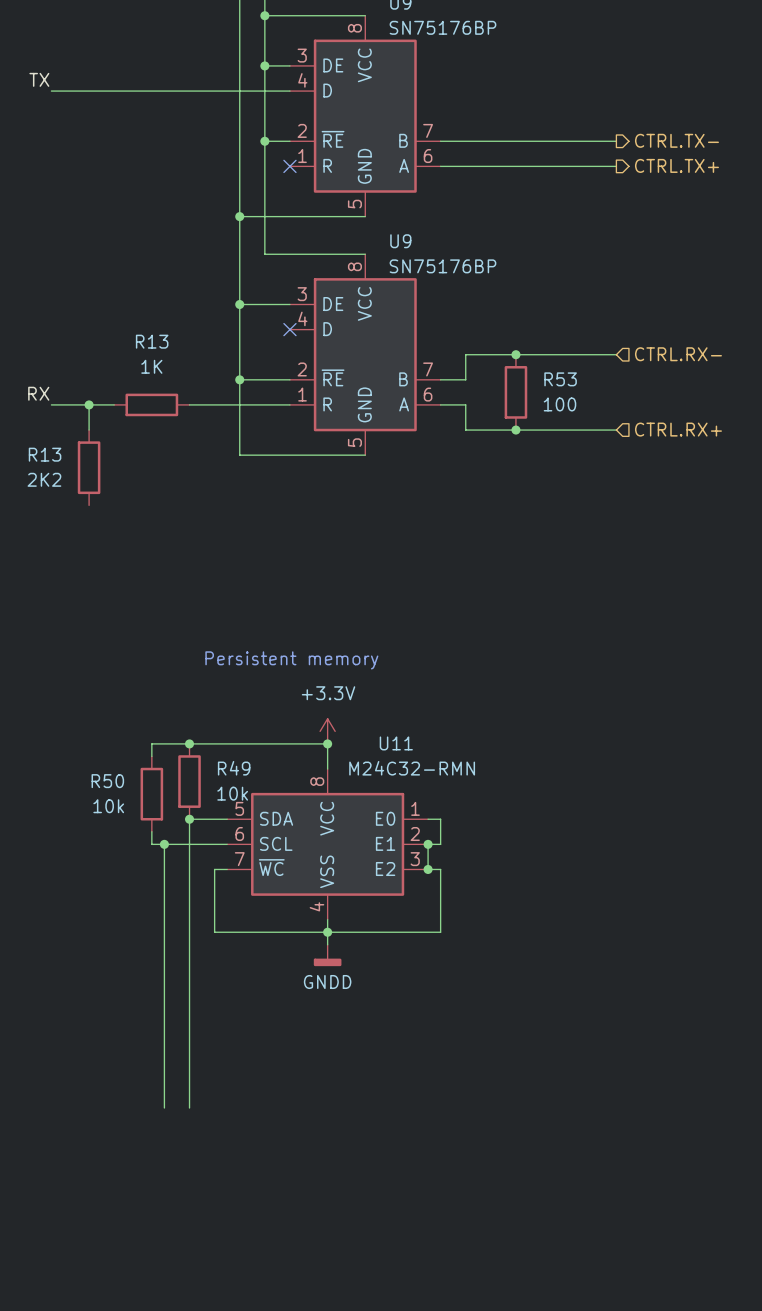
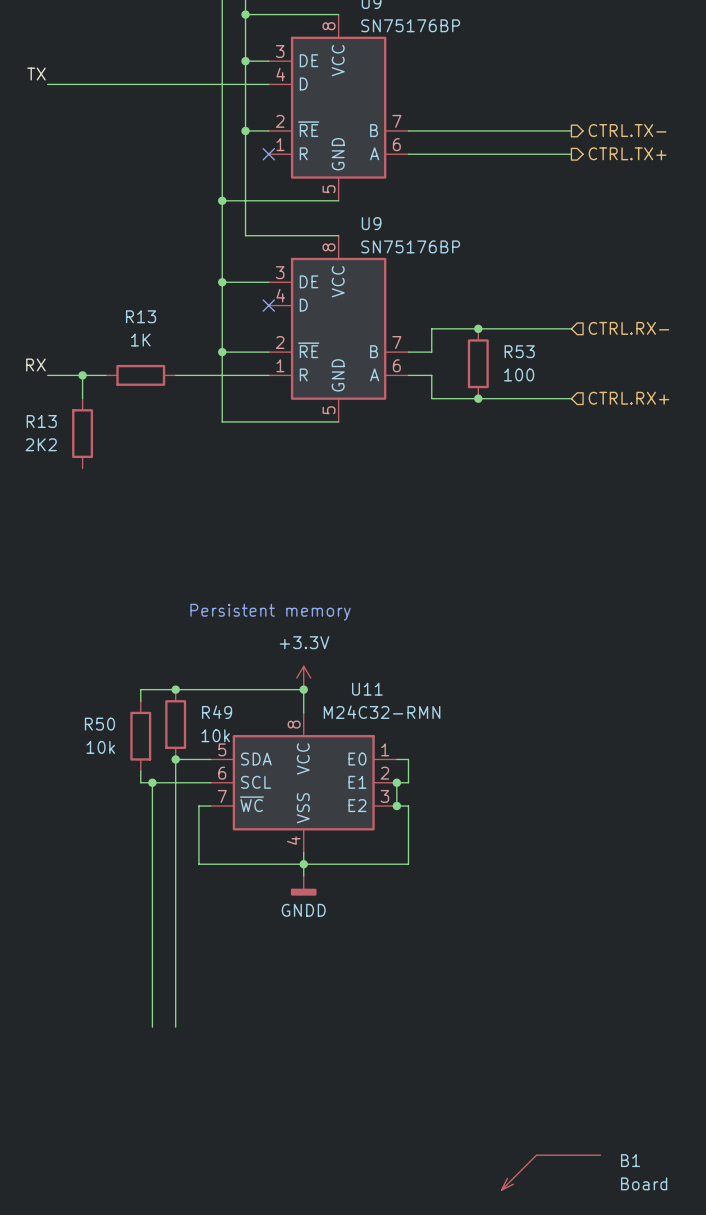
B1: none -> Board (551, 1172)

